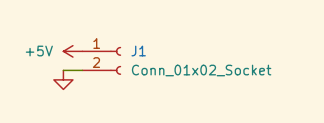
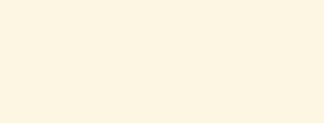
power symbol: +5V (72, 51) -> none
J1: Conn_01x02_Socket (101, 60) -> none
wire: (63, 70) (82, 70) -> none
power symbol: (63, 79) -> none

